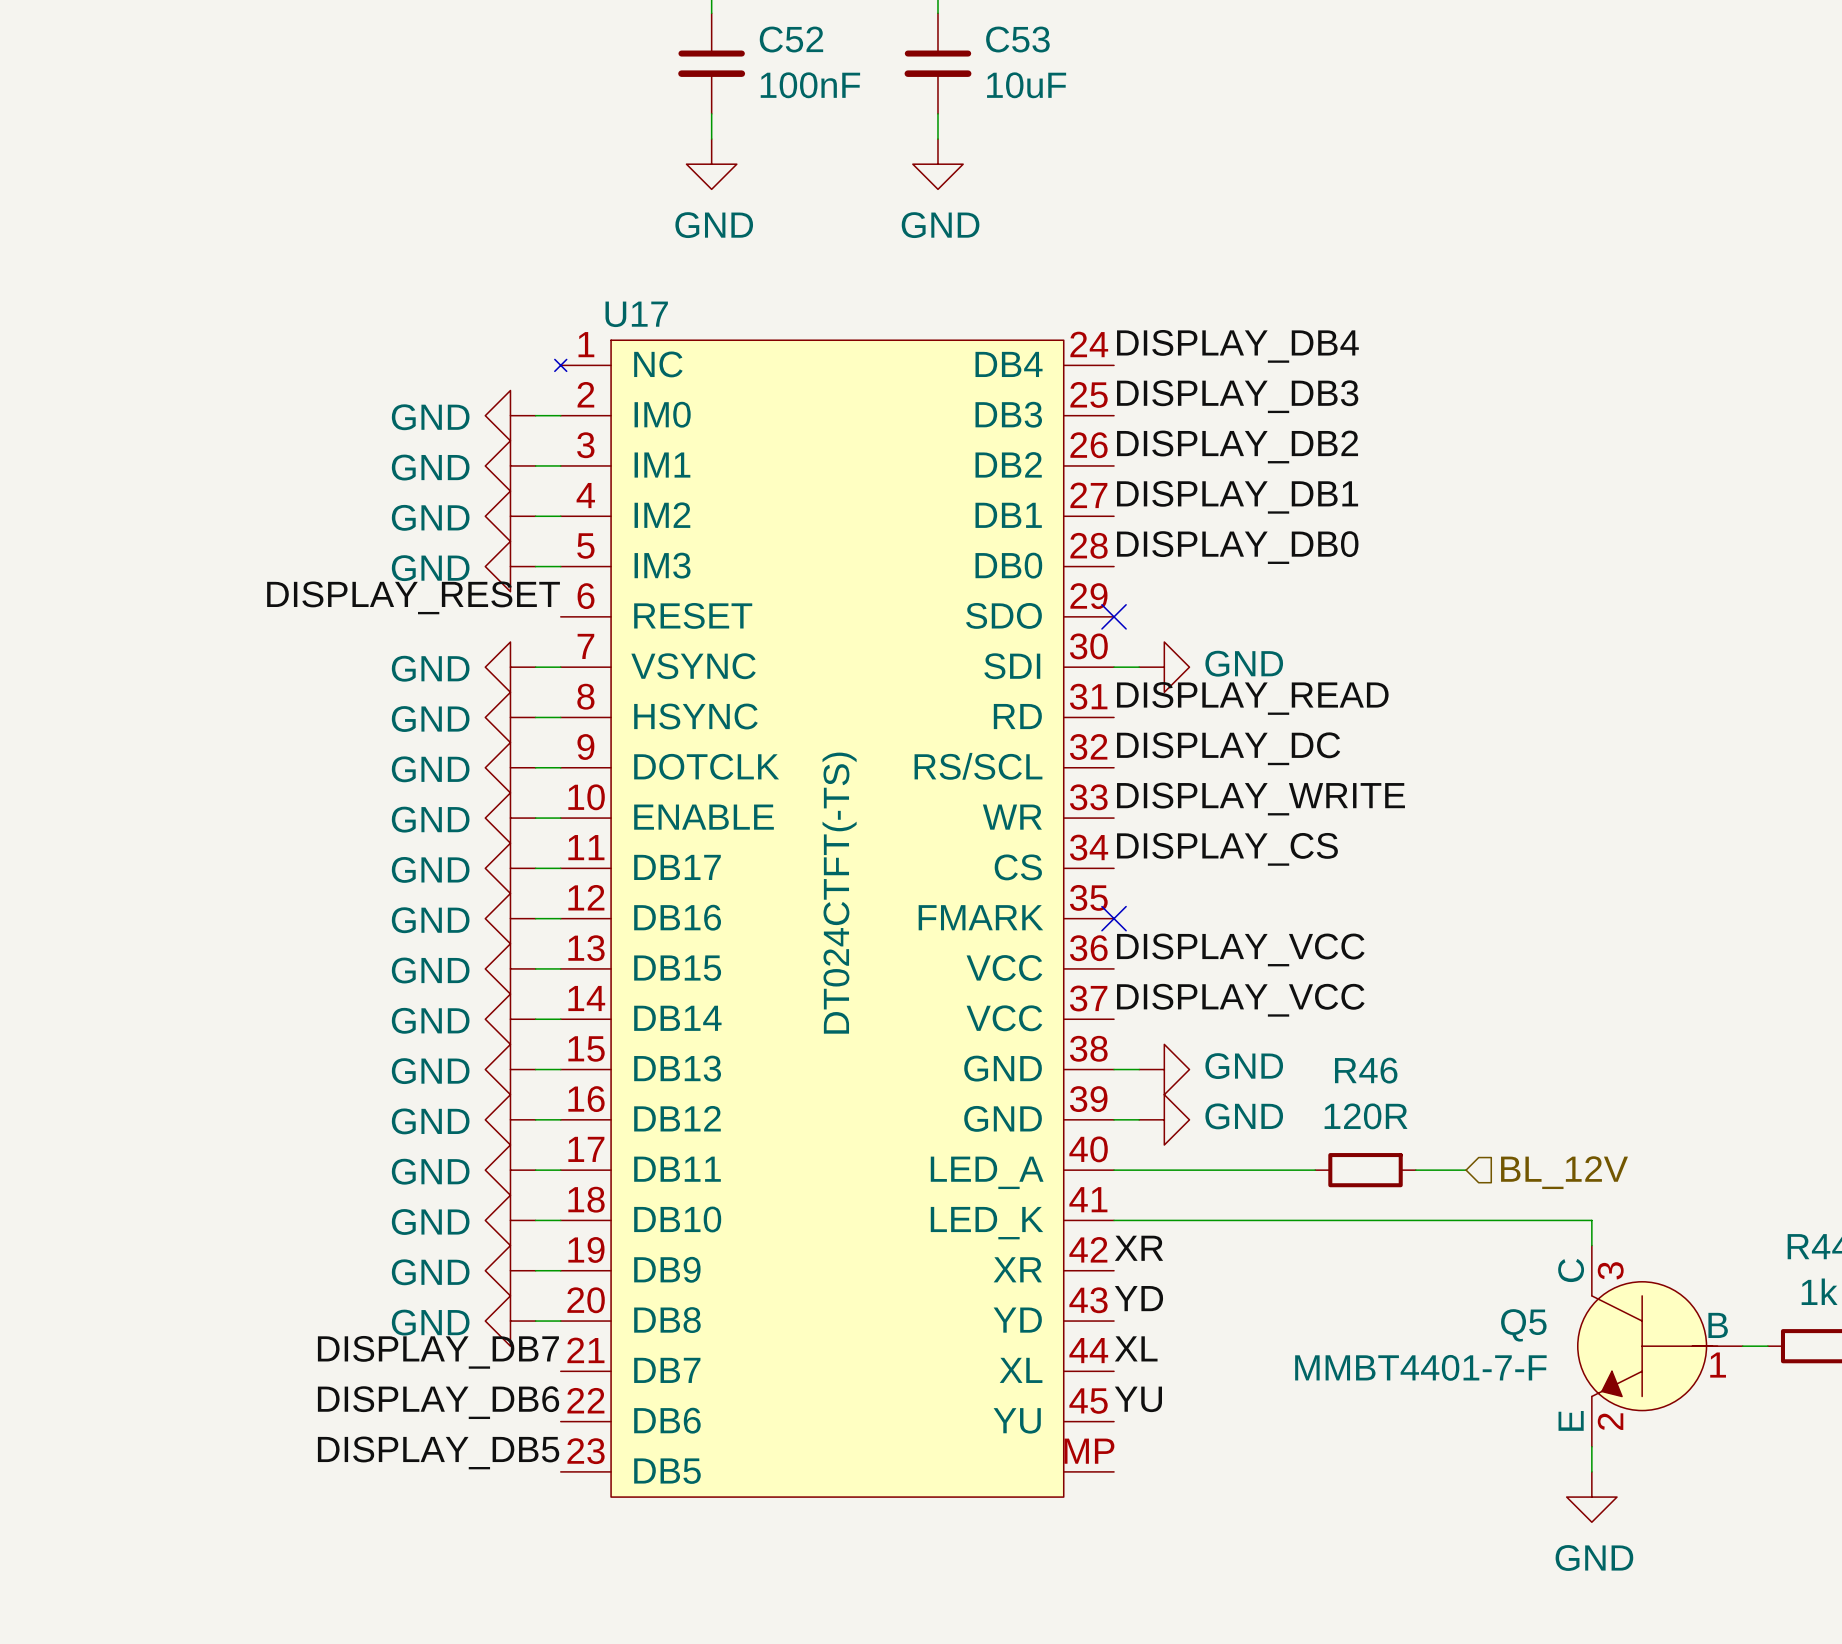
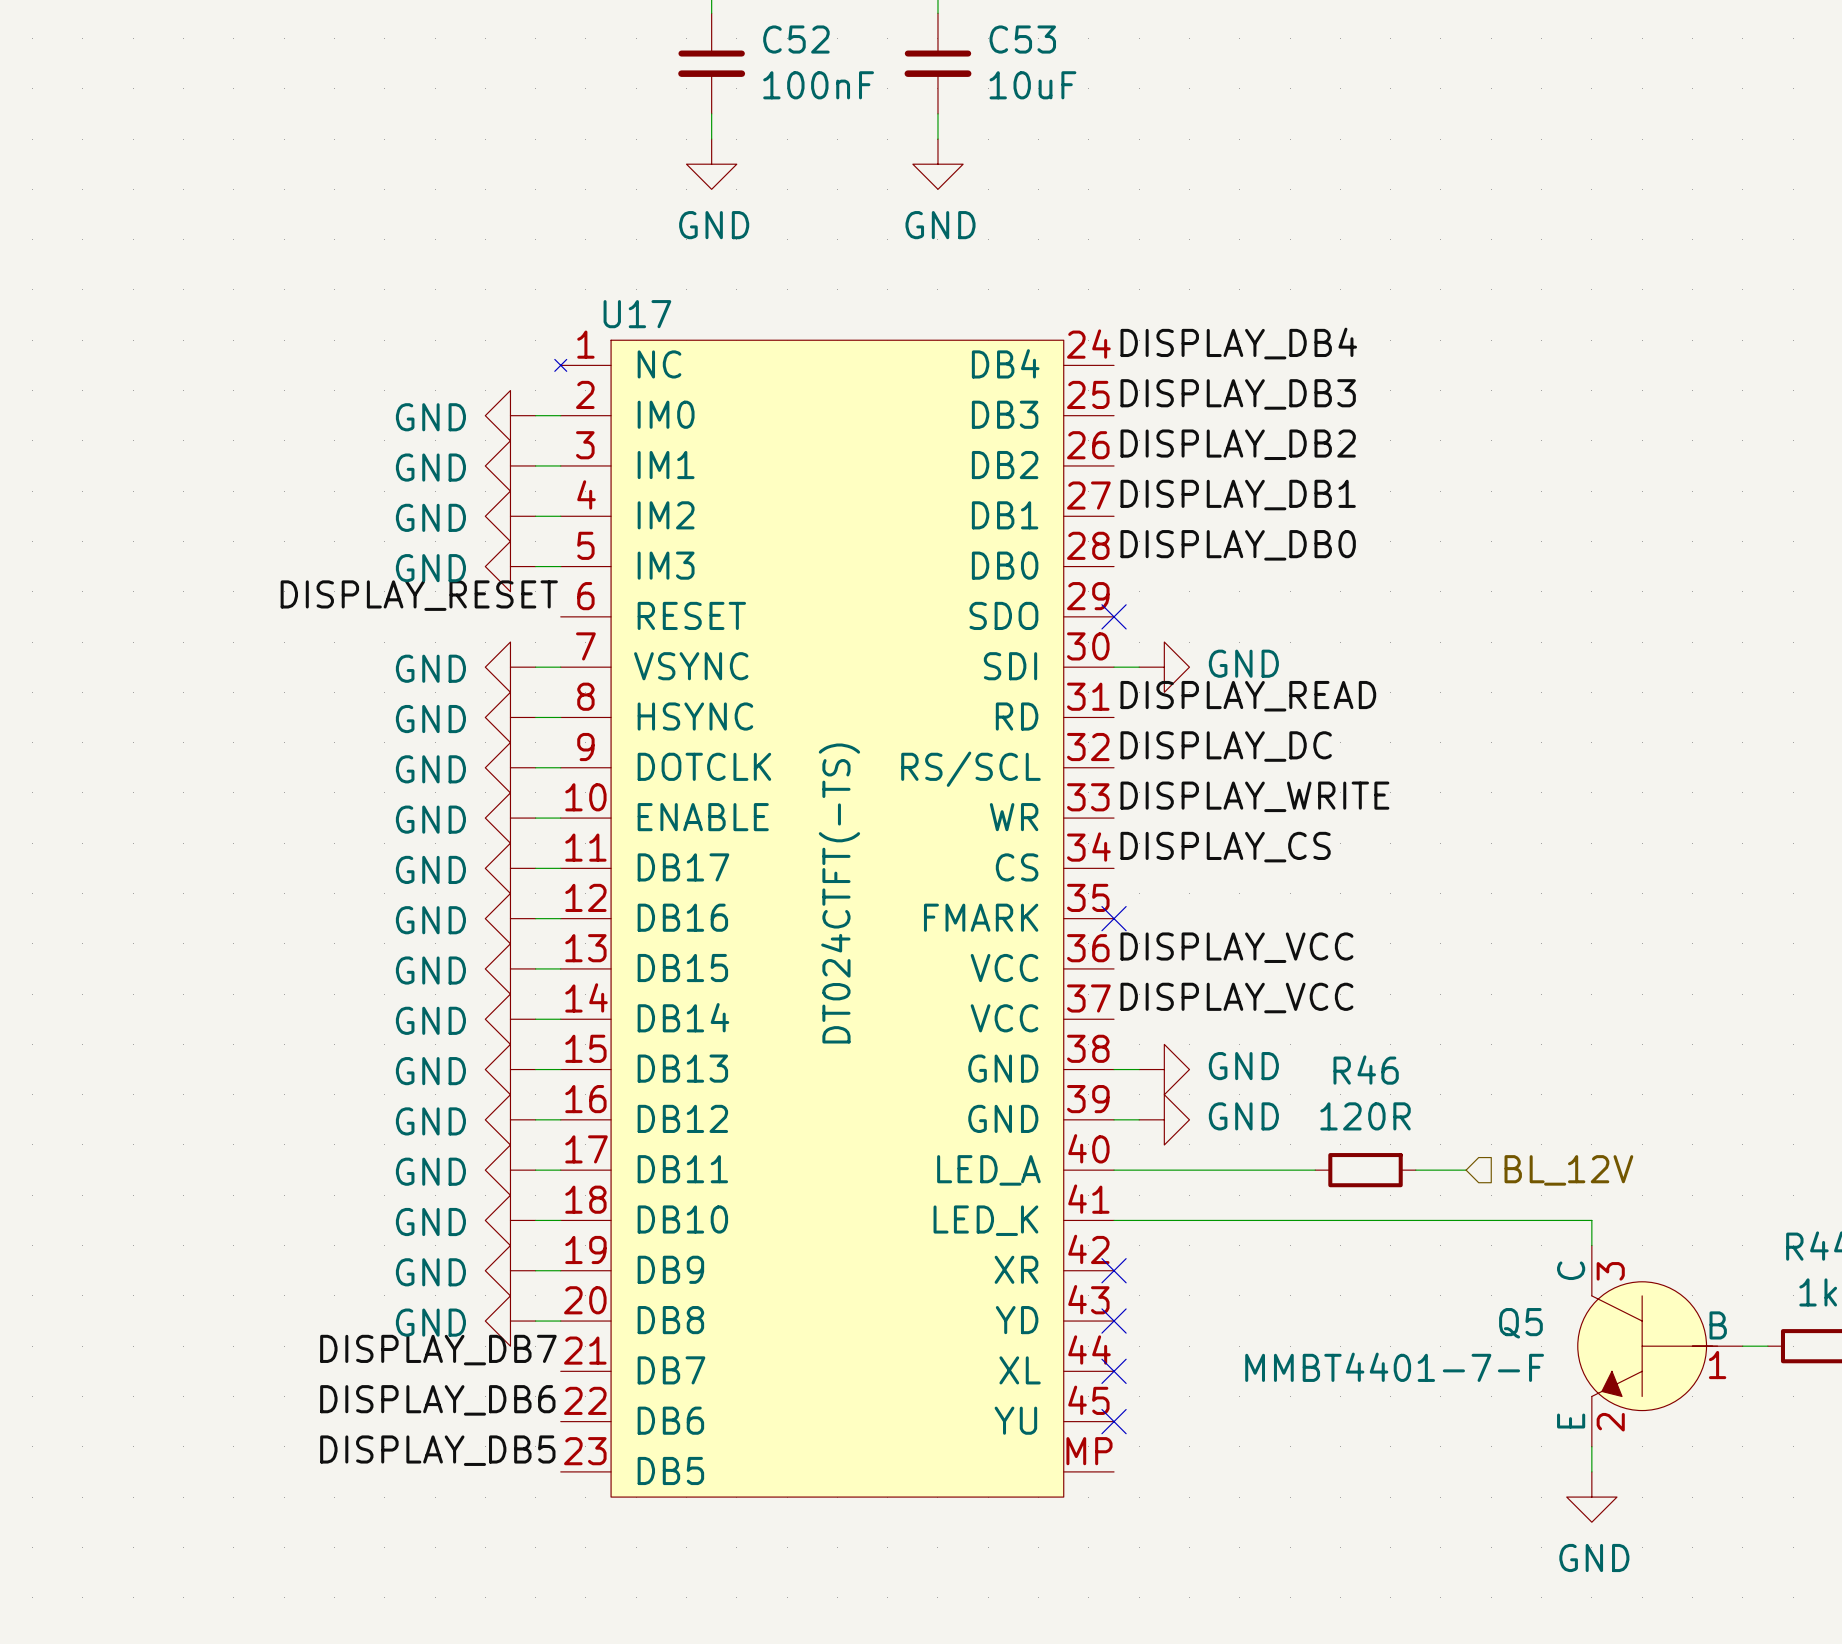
label: XR (1138, 1248) -> none
no-connect mark: none -> (1114, 1270)
label: YD (1138, 1298) -> none
no-connect mark: none -> (1114, 1321)
label: XL (1136, 1348) -> none
no-connect mark: none -> (1114, 1371)
label: YU (1138, 1399) -> none
no-connect mark: none -> (1114, 1421)

